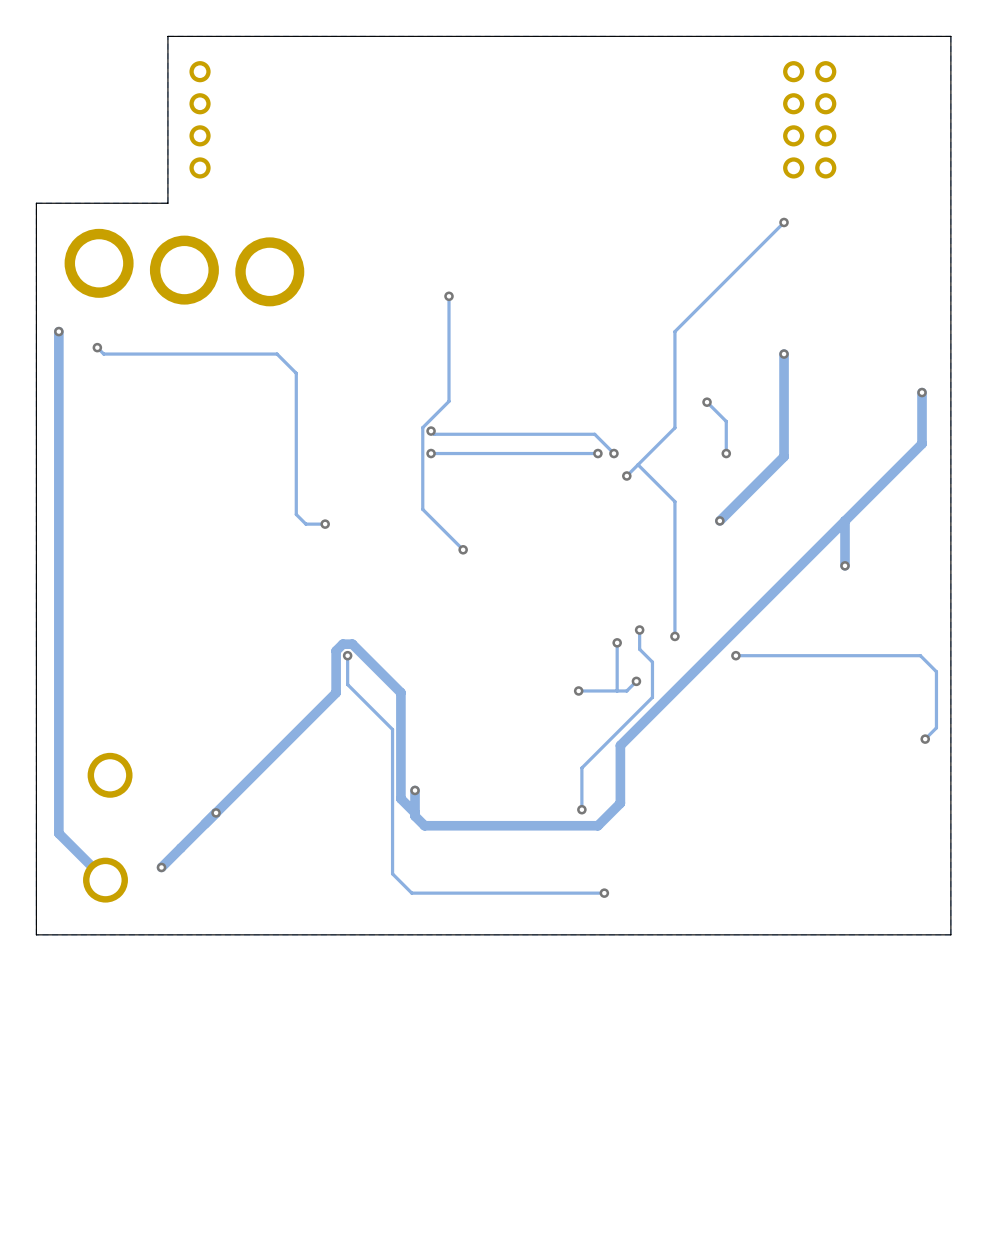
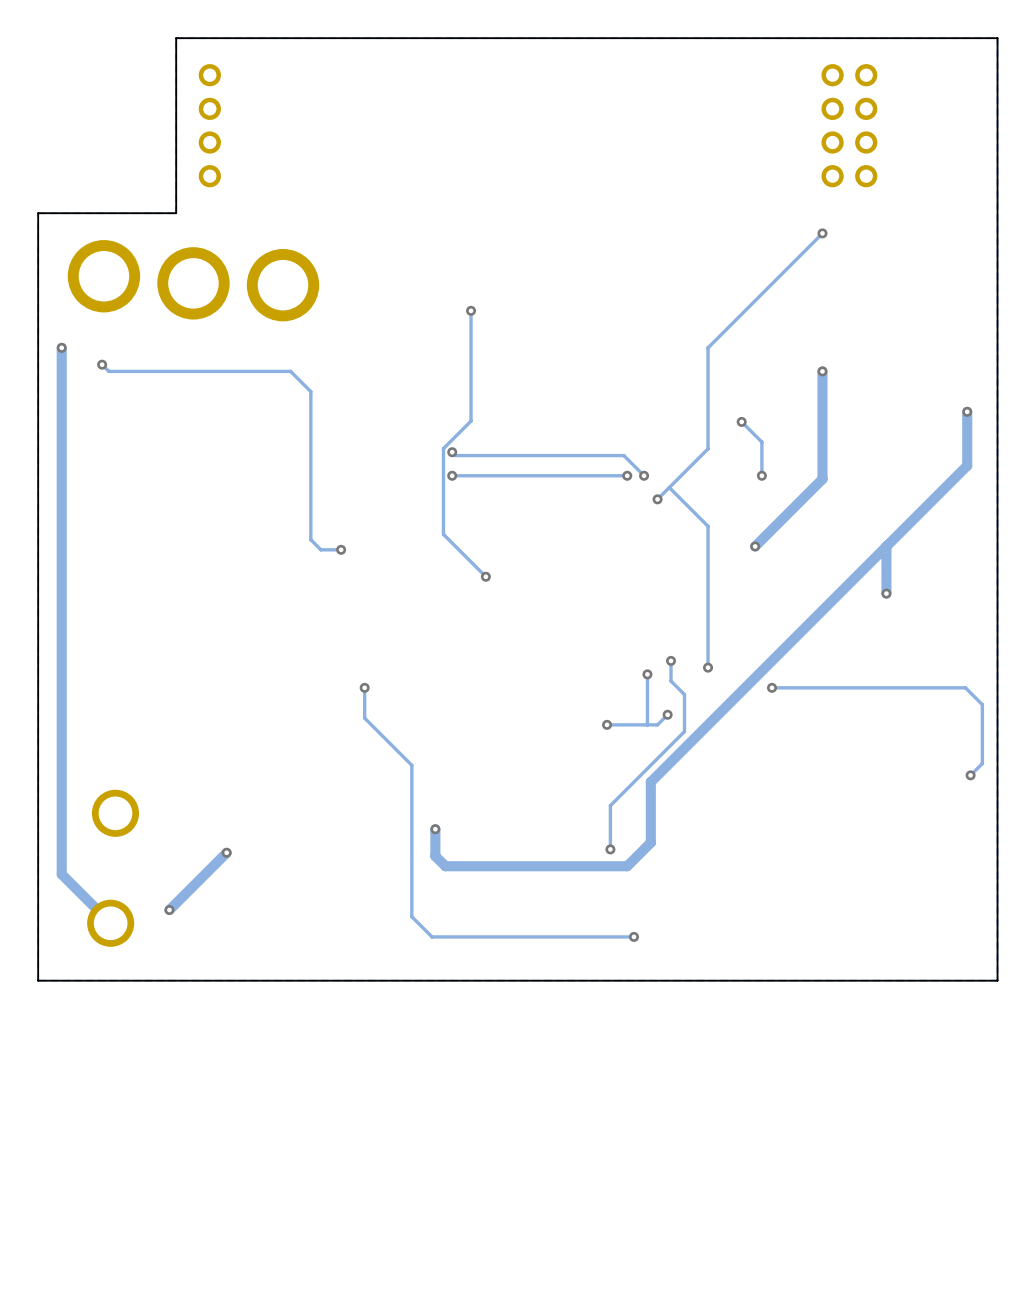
track: (415, 812) (400, 798) (400, 692) (352, 644) (342, 644) (336, 650) (336, 692) (216, 812) -> none

